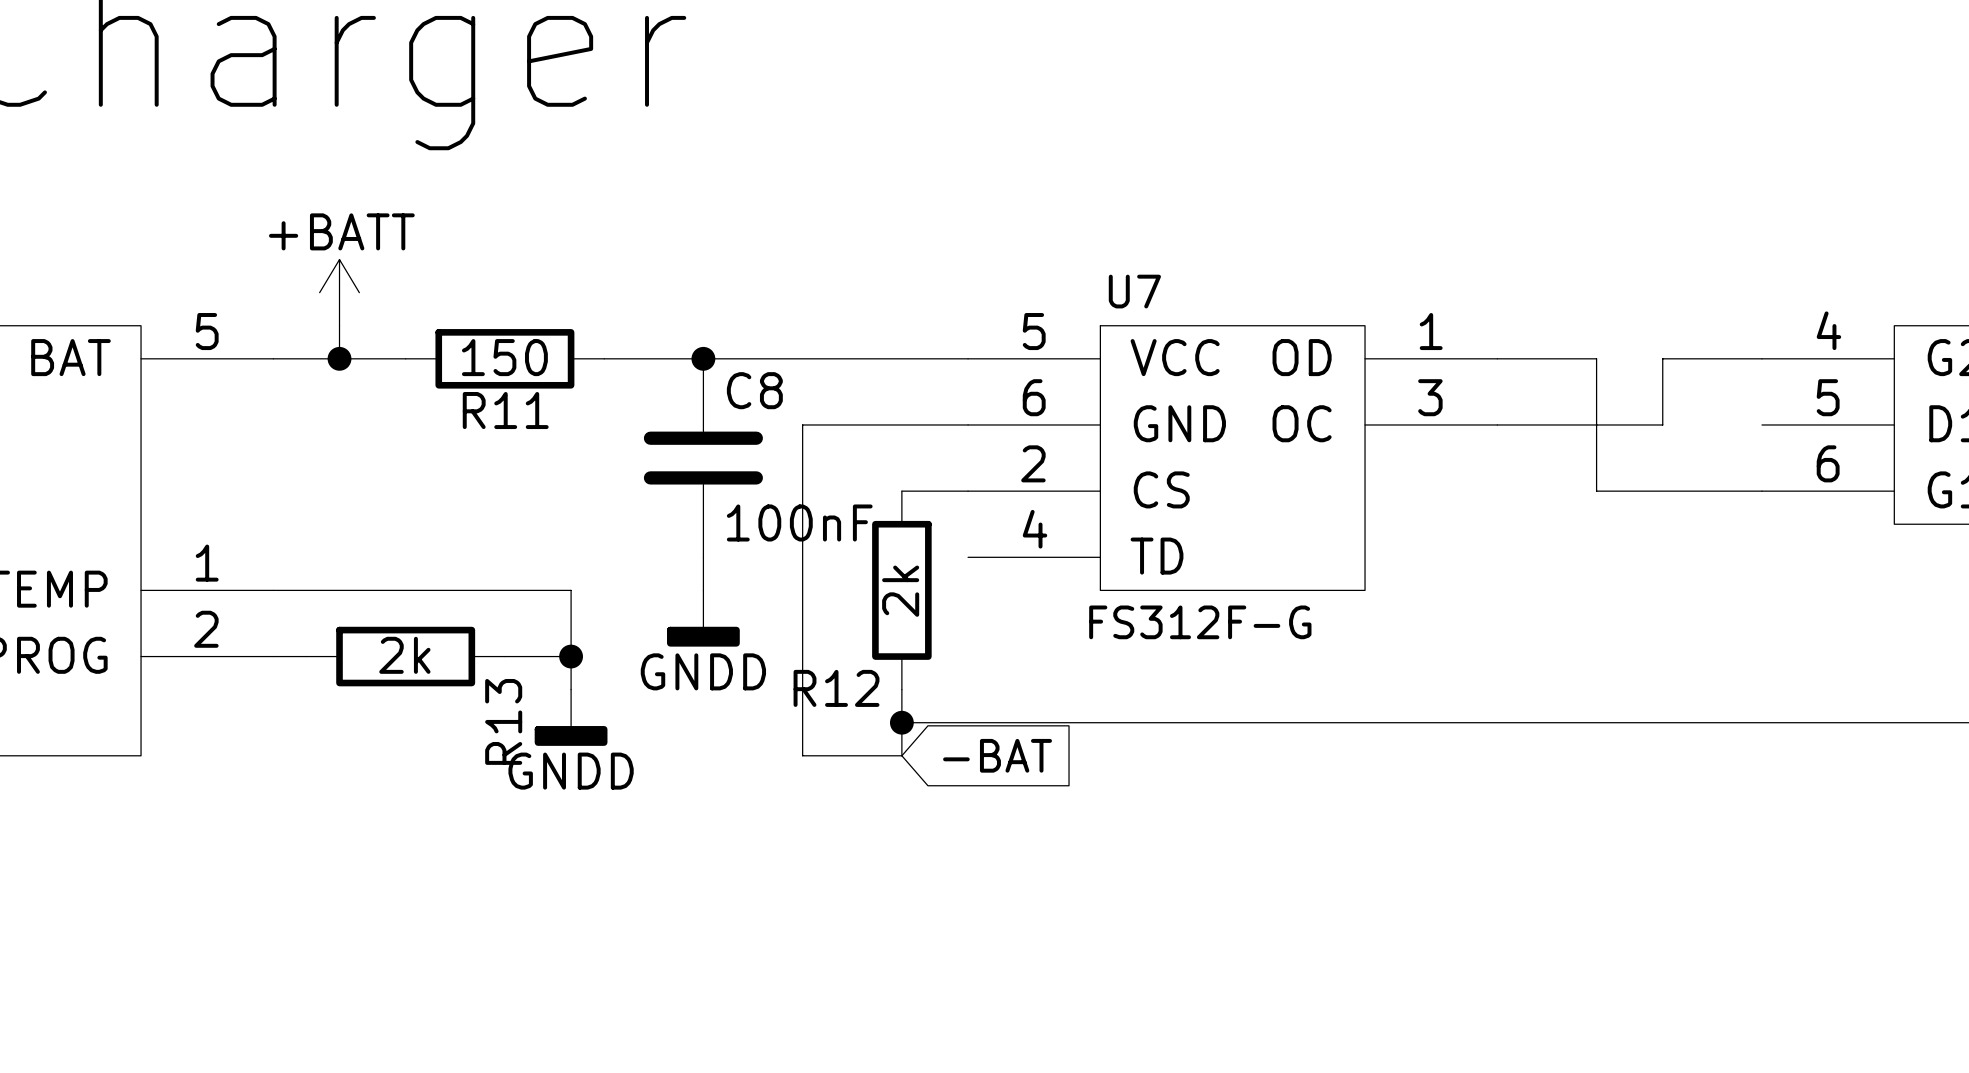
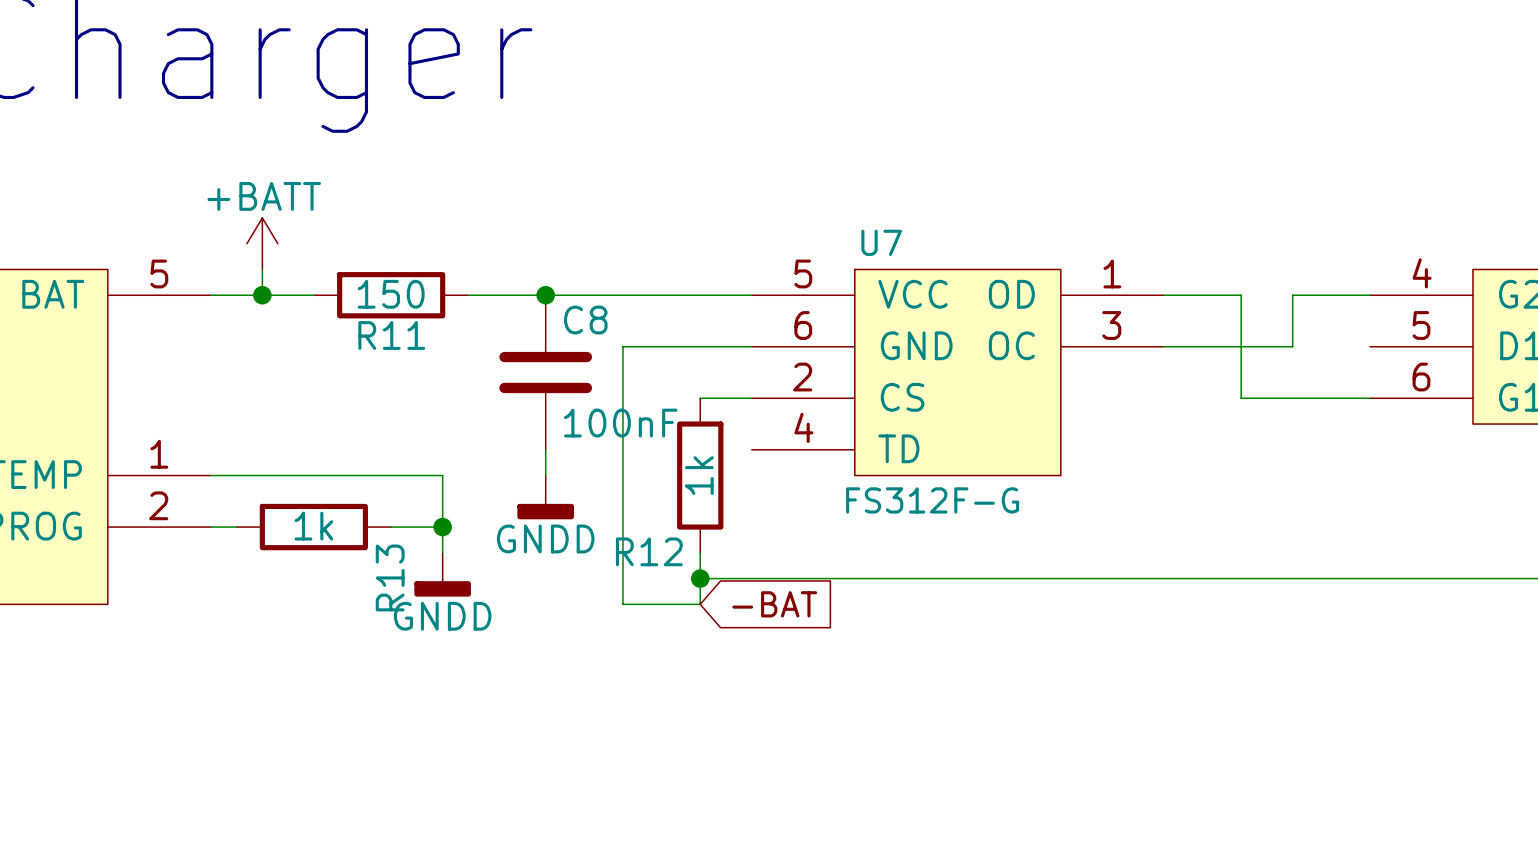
R12 value: 2k (900, 591) -> 1k (699, 475)
R13 value: 2k (404, 655) -> 1k (313, 526)

